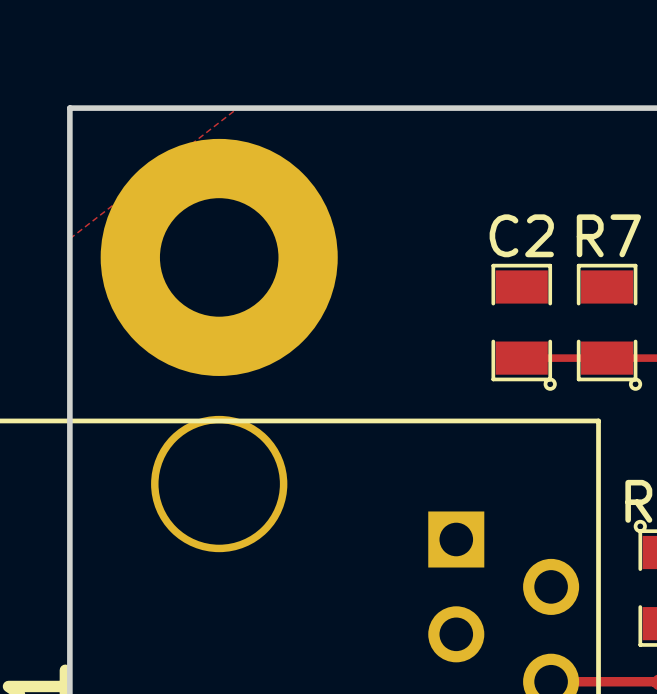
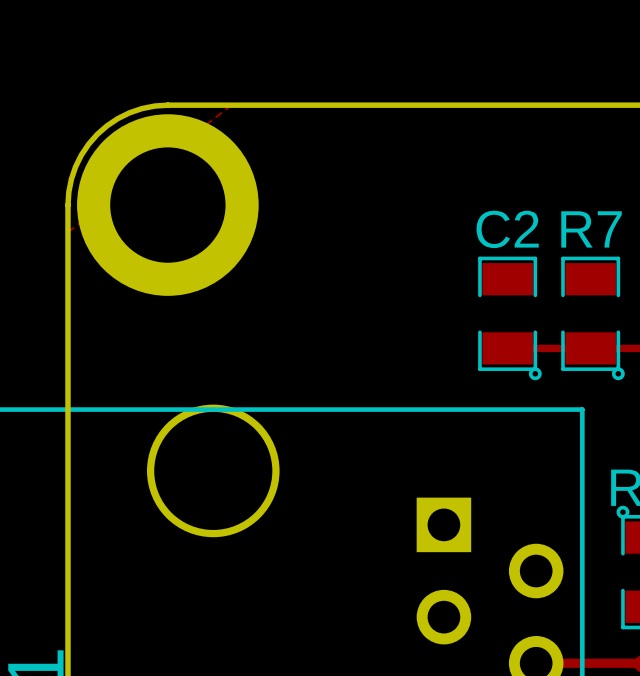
board edge: (172, 108) (69, 108) (69, 210) -> (167, 105) (154, 106) (129, 112) (117, 118) (97, 134) (81, 155) (75, 166) (68, 192) (67, 205)
part: none -> (167, 205)
part: (219, 257) -> none

